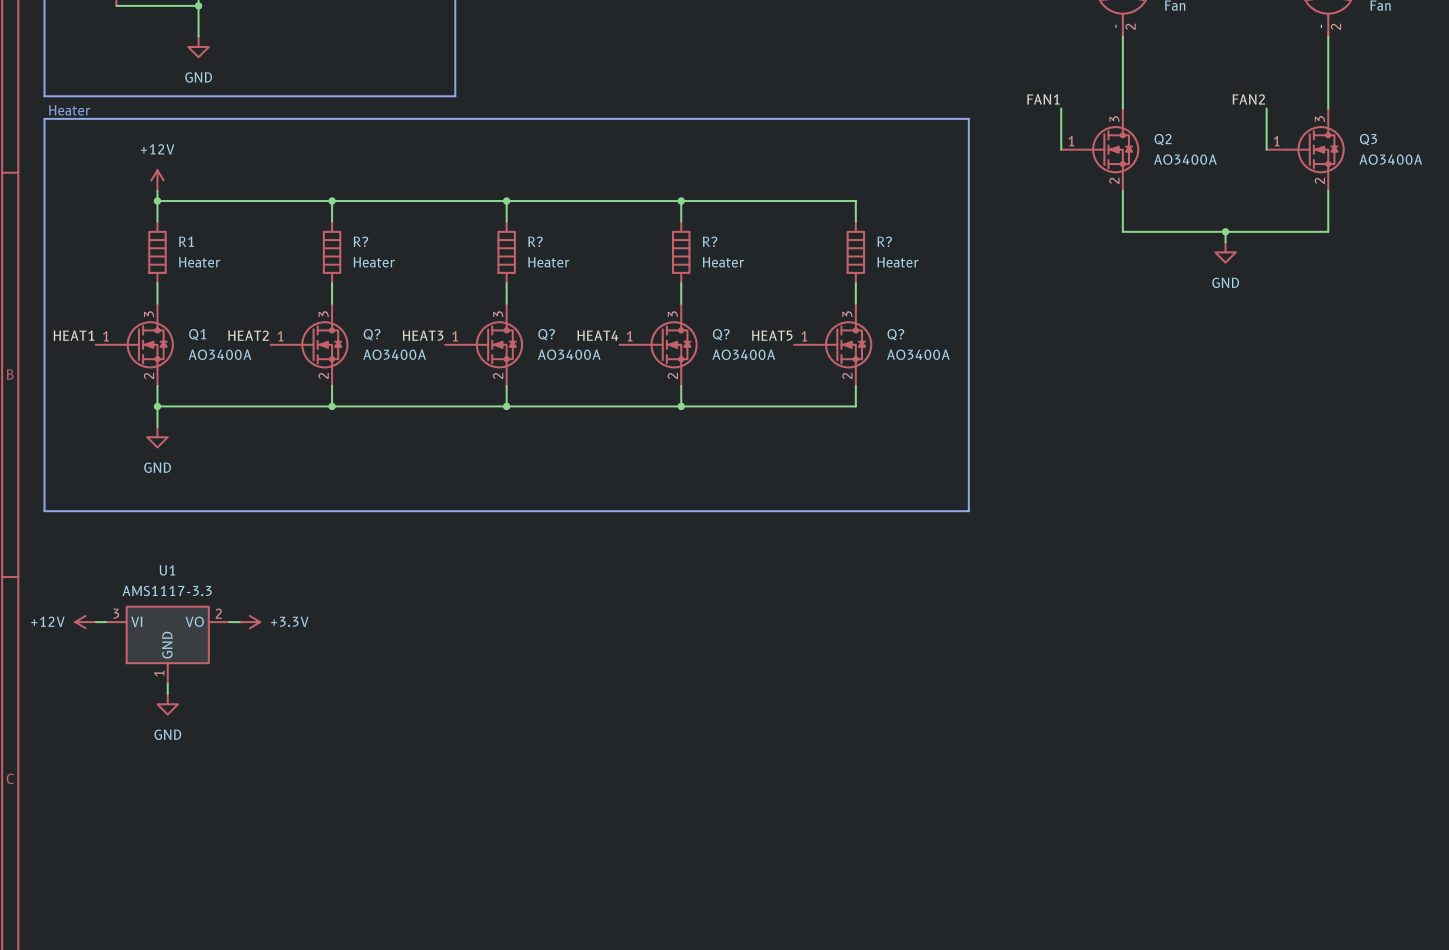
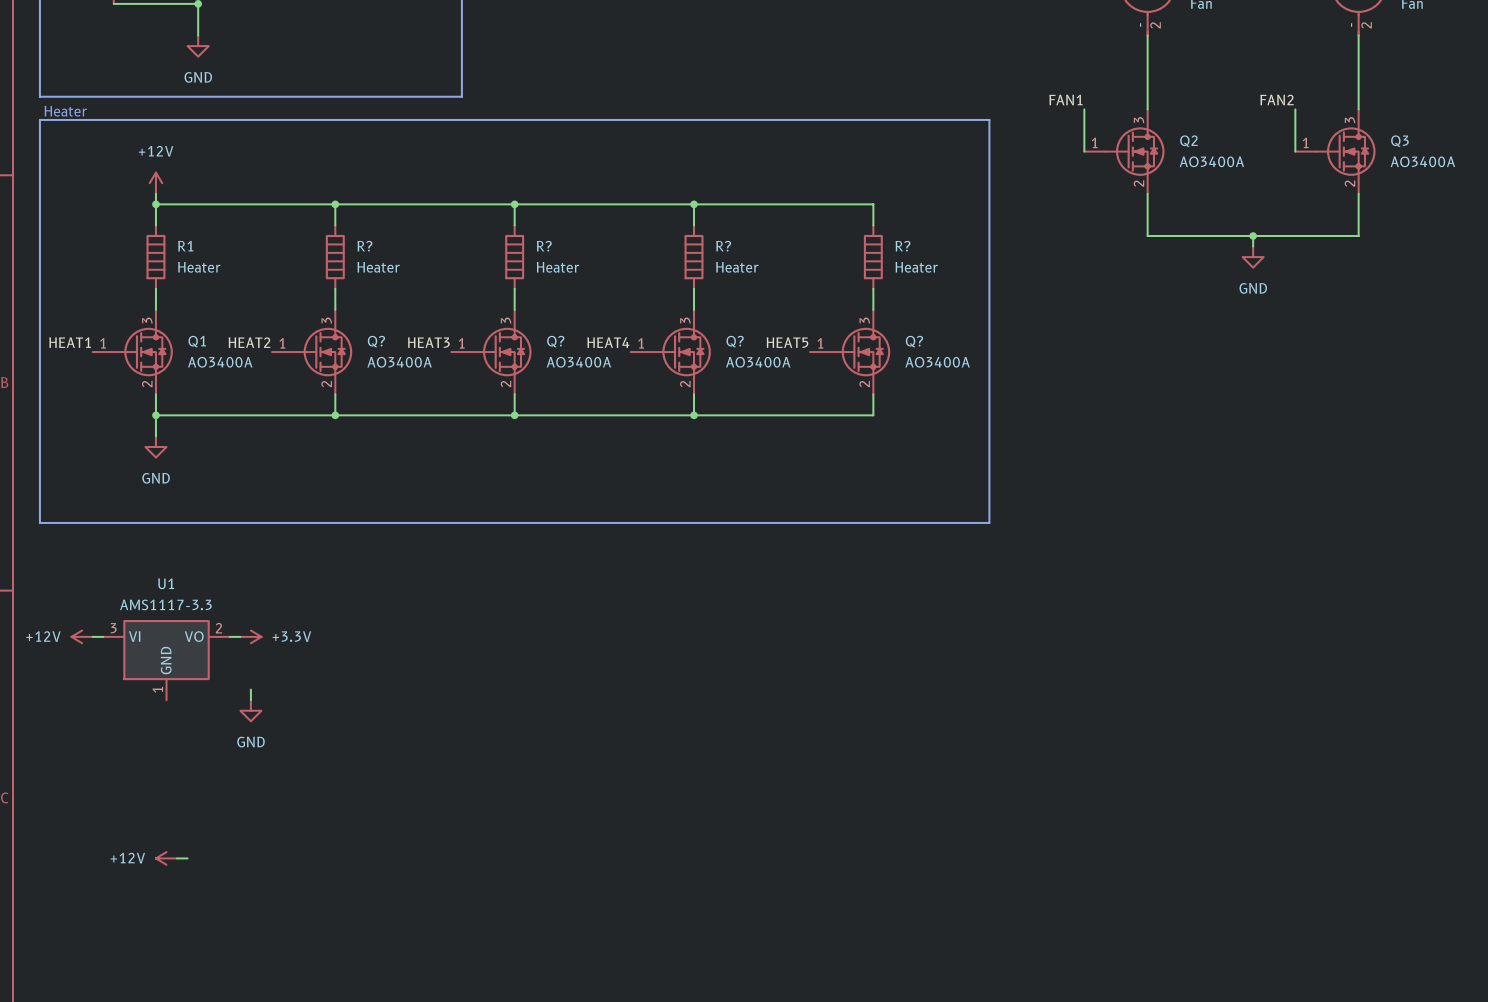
wire: (167, 683) (167, 693) -> (250, 689) (250, 700)
power symbol position: GND (167, 704) -> GND (250, 710)
power symbol: none -> +12V (166, 858)
wire: none -> (177, 858) (187, 858)

